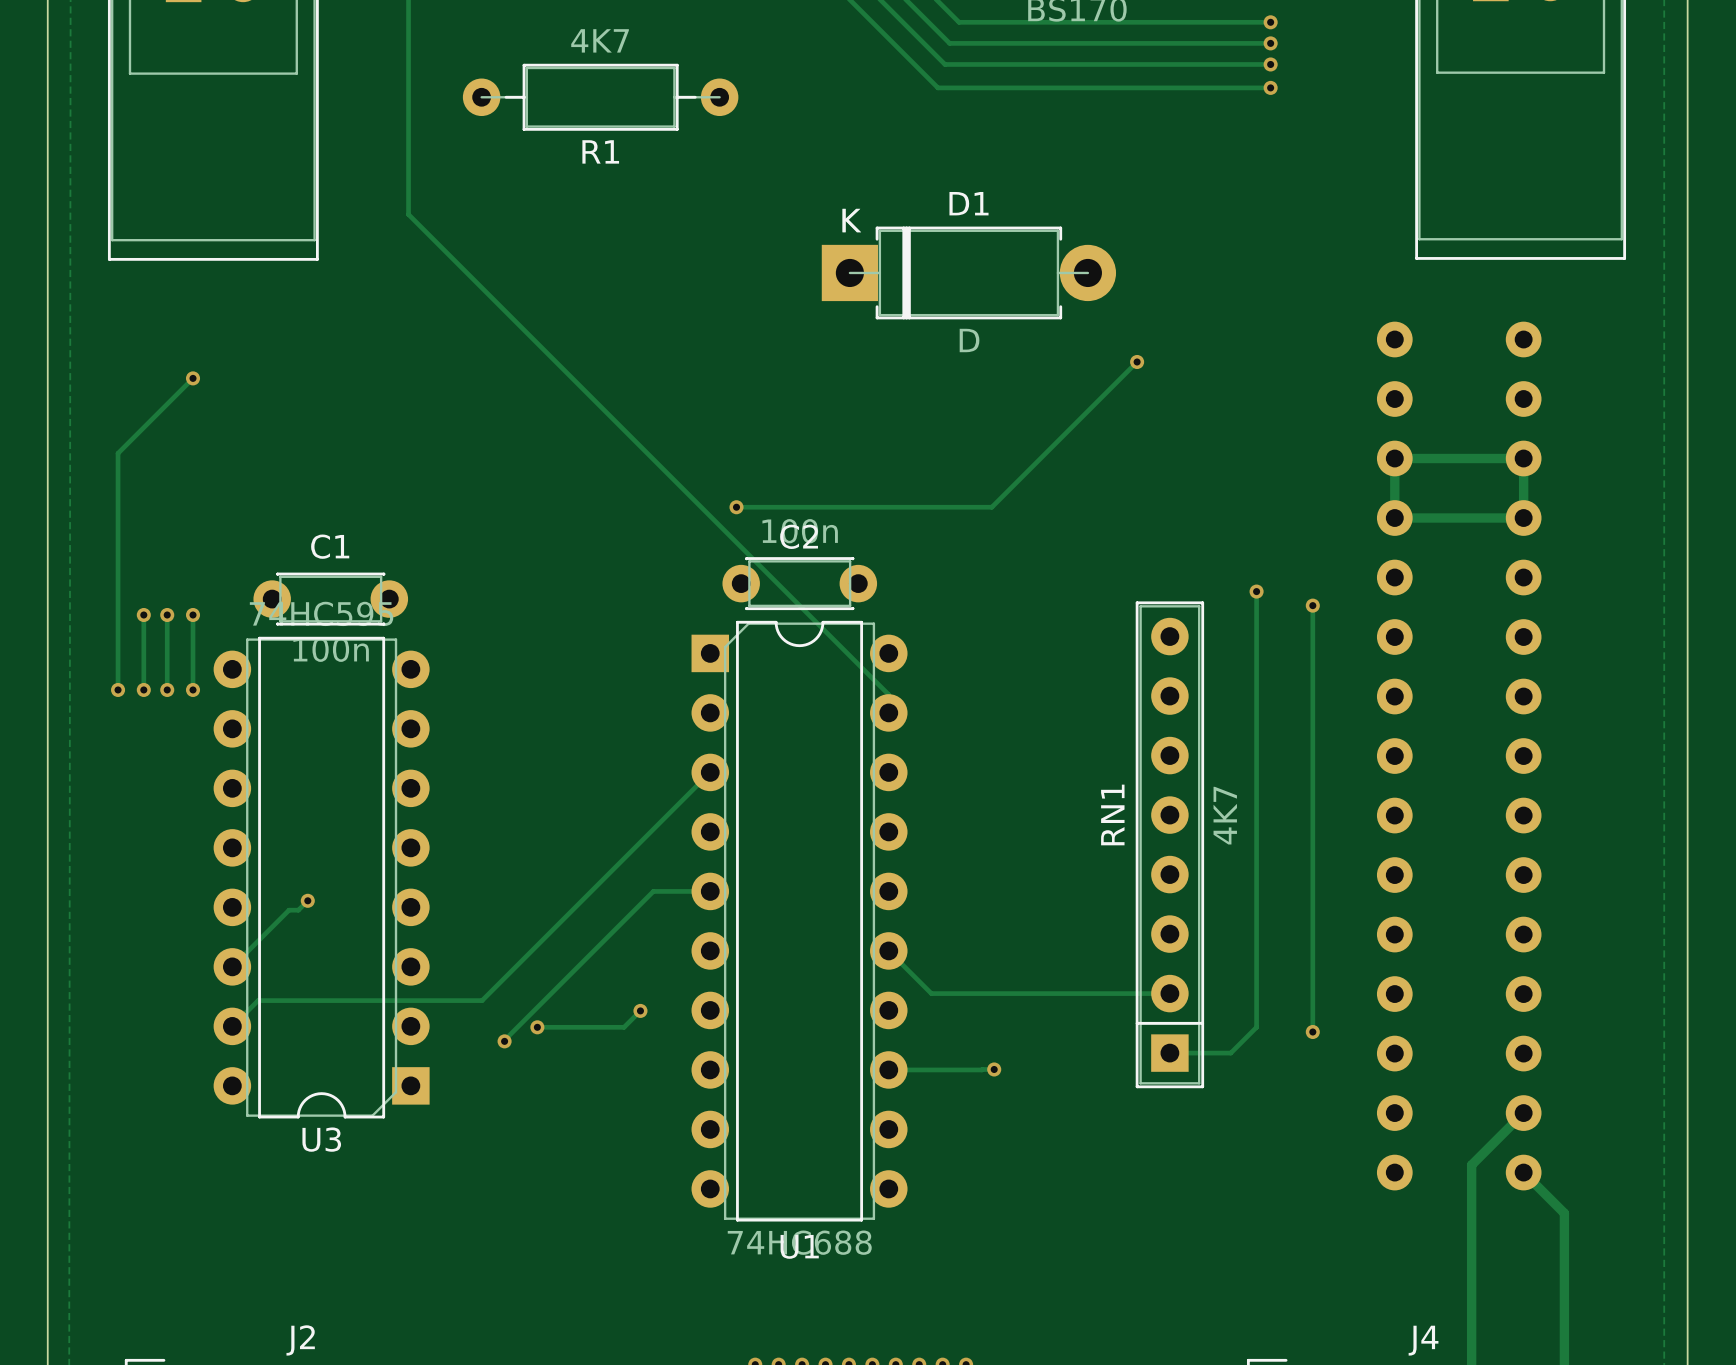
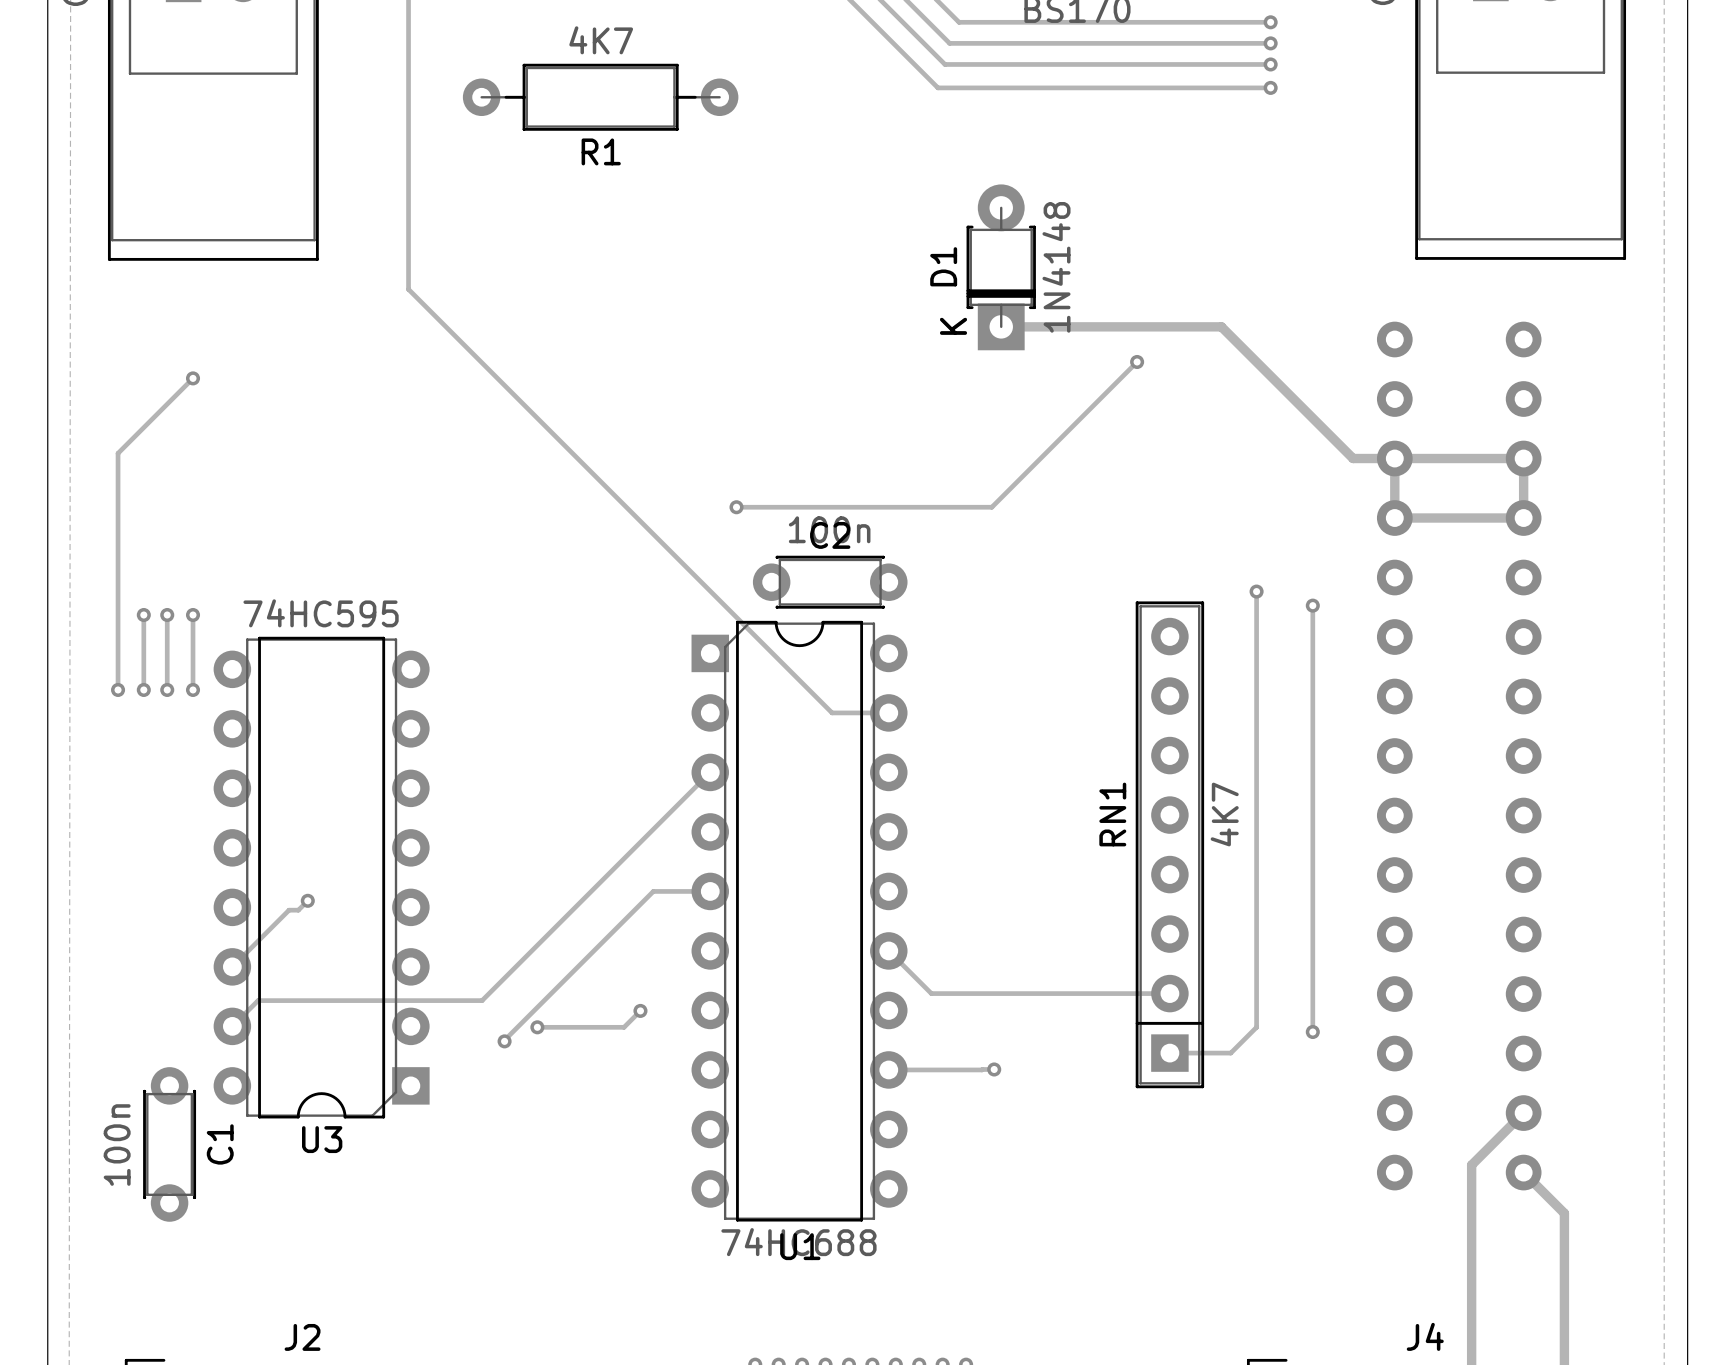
D1 name position: D1 (968, 203) -> D1 (943, 266)
track: (408, 214) (888, 694) (888, 712) -> (408, 214) (408, 289) (832, 712) (888, 712)
D1 footprint: [821, 226, 1117, 320] -> [966, 184, 1036, 351]
track: none -> (1001, 326) (1221, 326) (1353, 458) (1394, 458)
D1 value: D (969, 340) -> 1N4148 (1056, 267)
C2 position: (799, 583) -> (830, 582)
C1 rotation: 0° (330, 599) -> 90° clockwise (169, 1144)
C1 position: (330, 599) -> (169, 1144)

